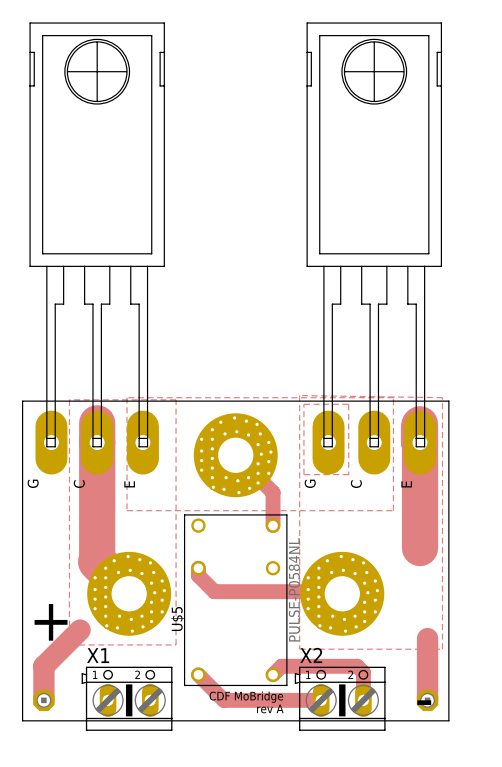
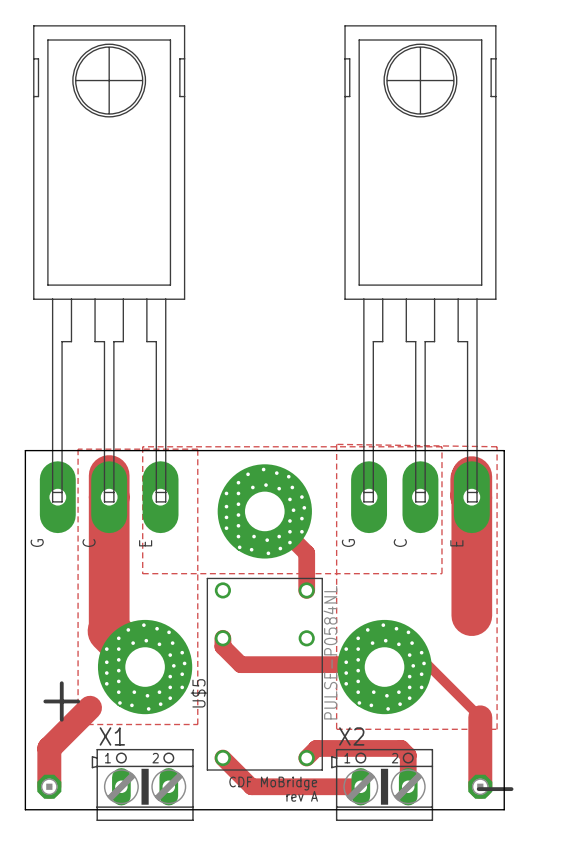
zone outline: (303, 404) (348, 404) (348, 474) (303, 474) (303, 404) -> none
track: none -> (425, 662) (480, 717)

